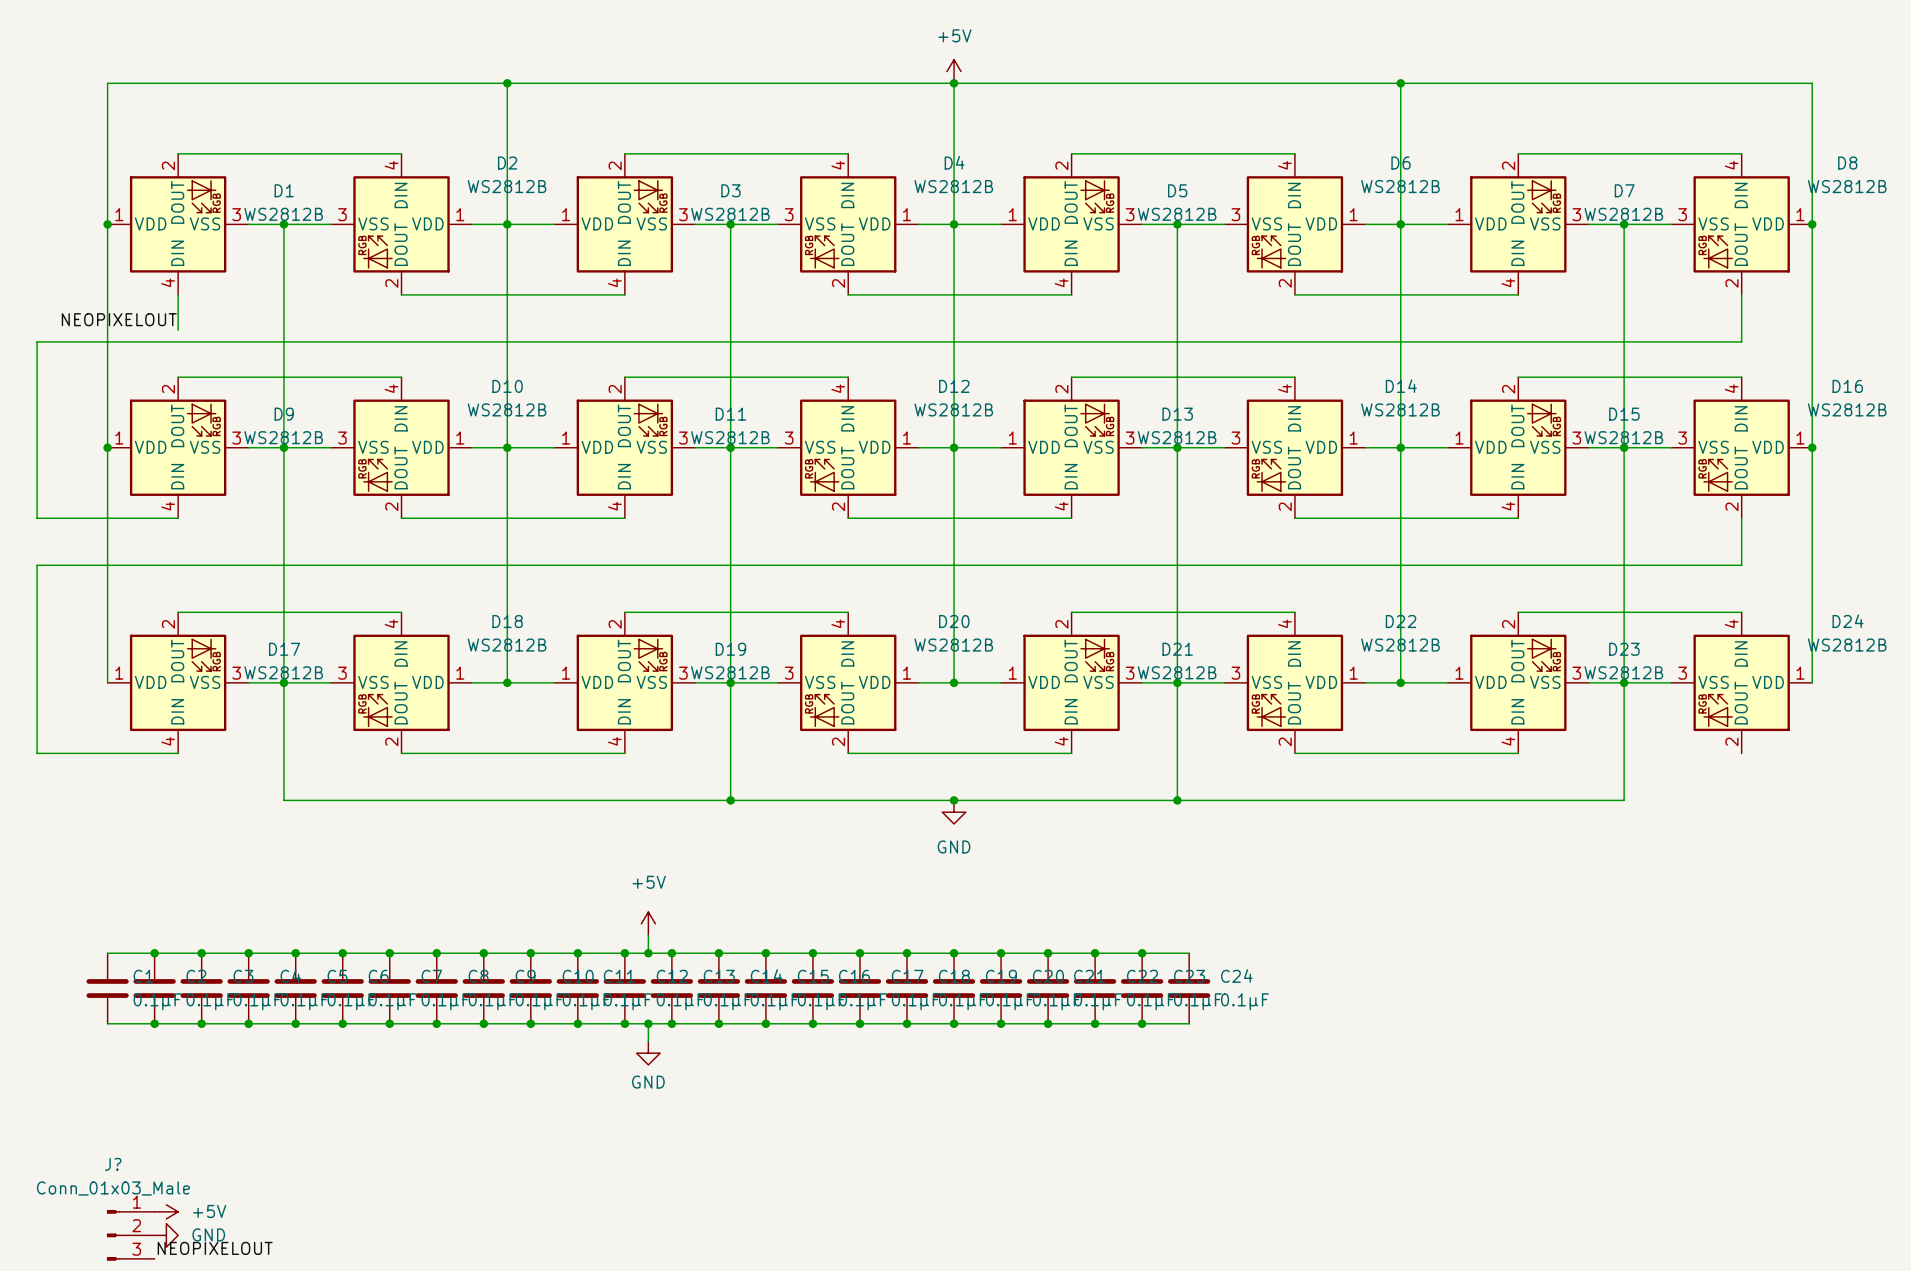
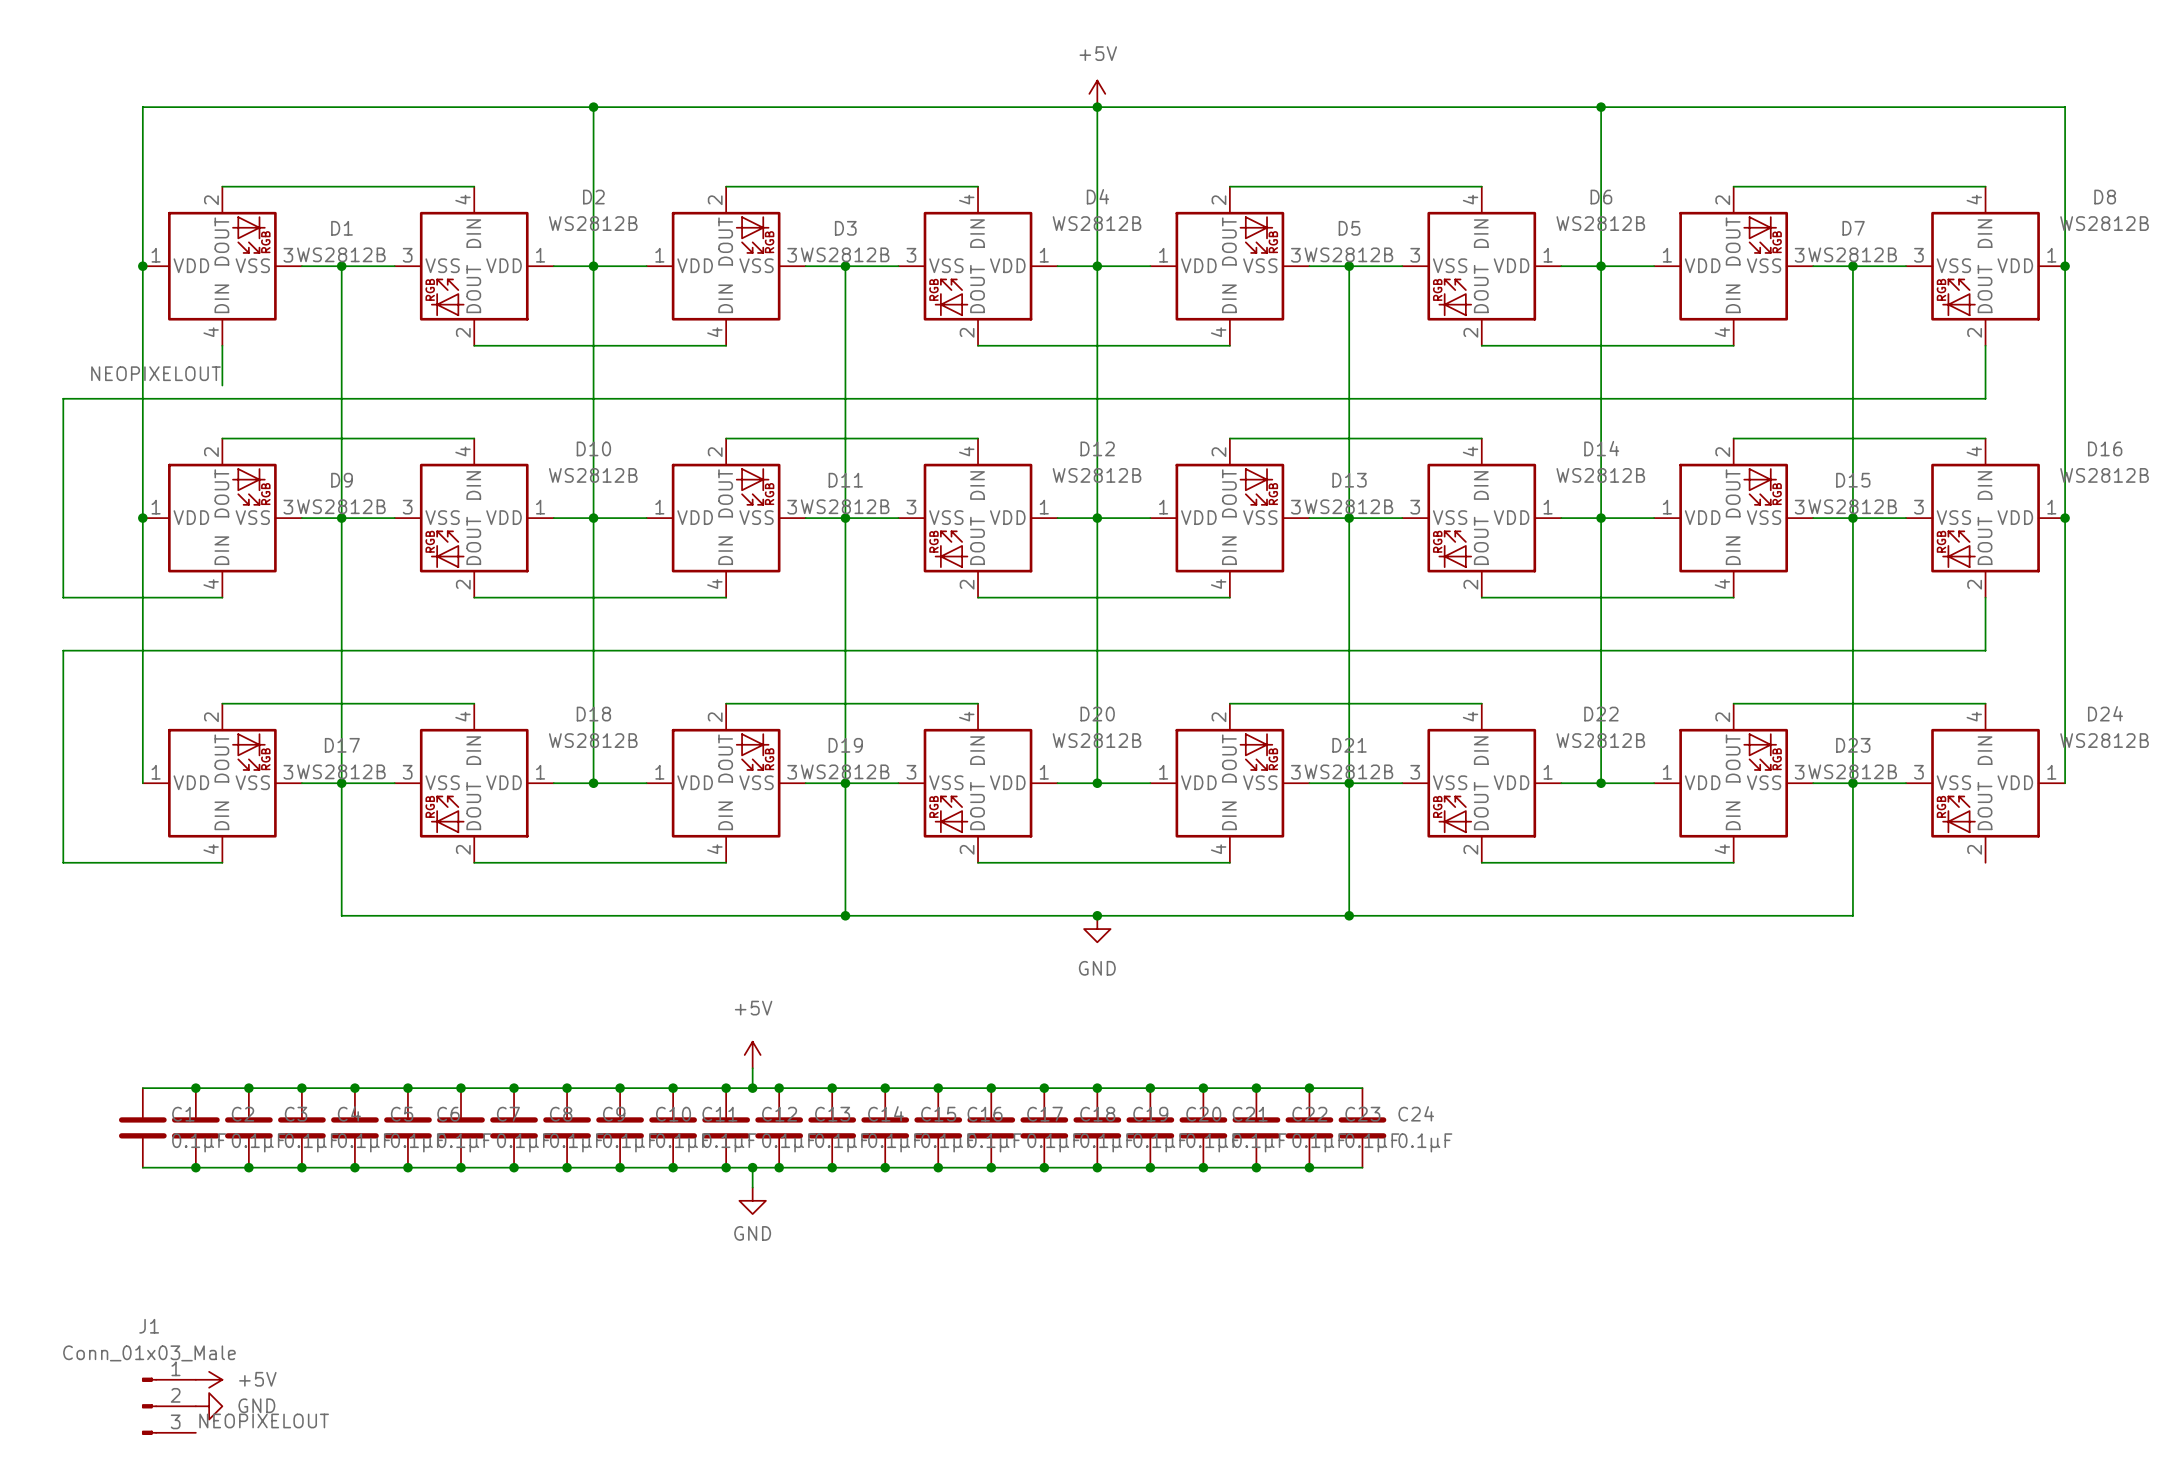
J? name: J? (113, 1164) -> J1 (149, 1326)

